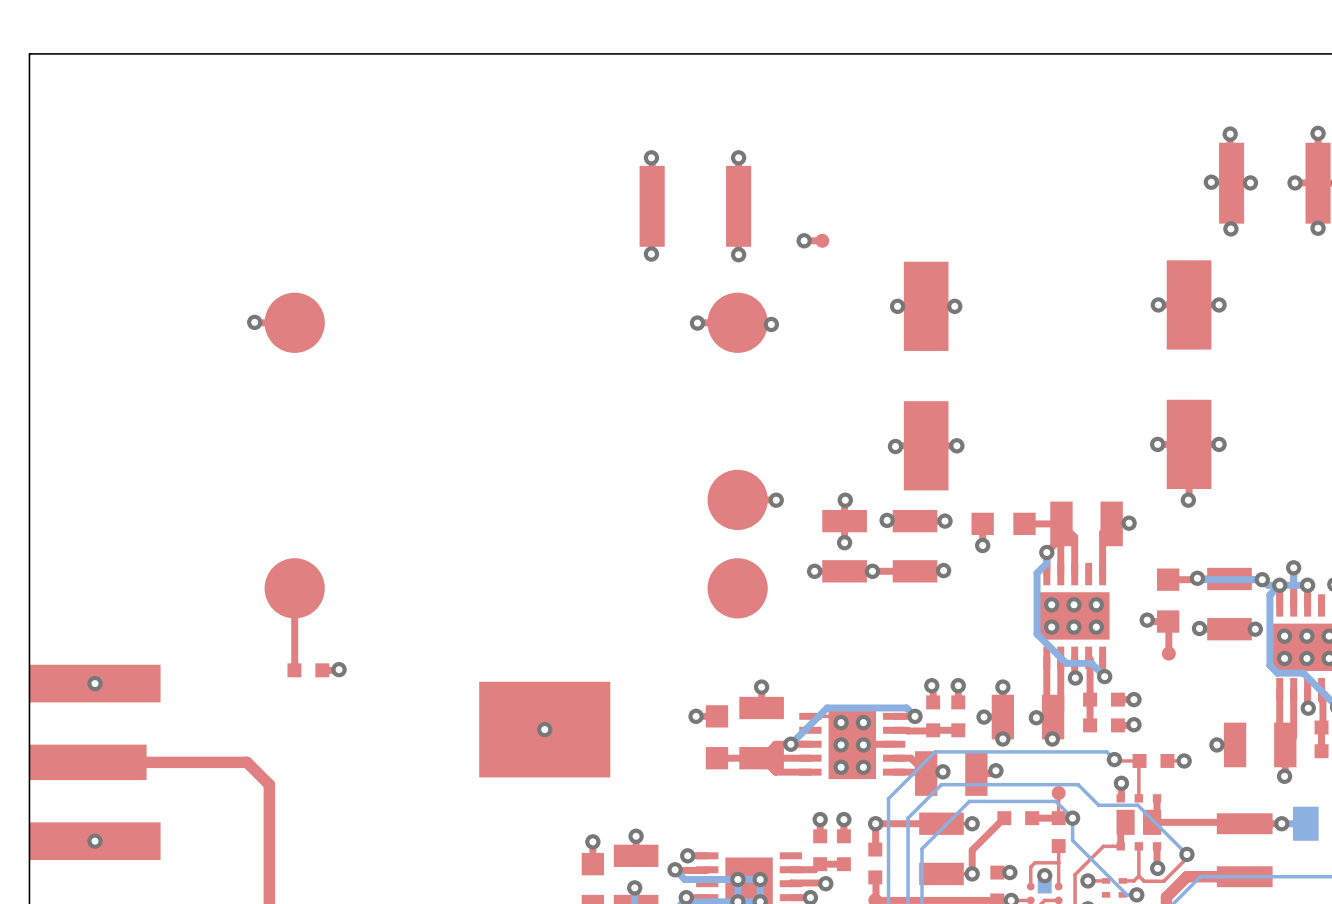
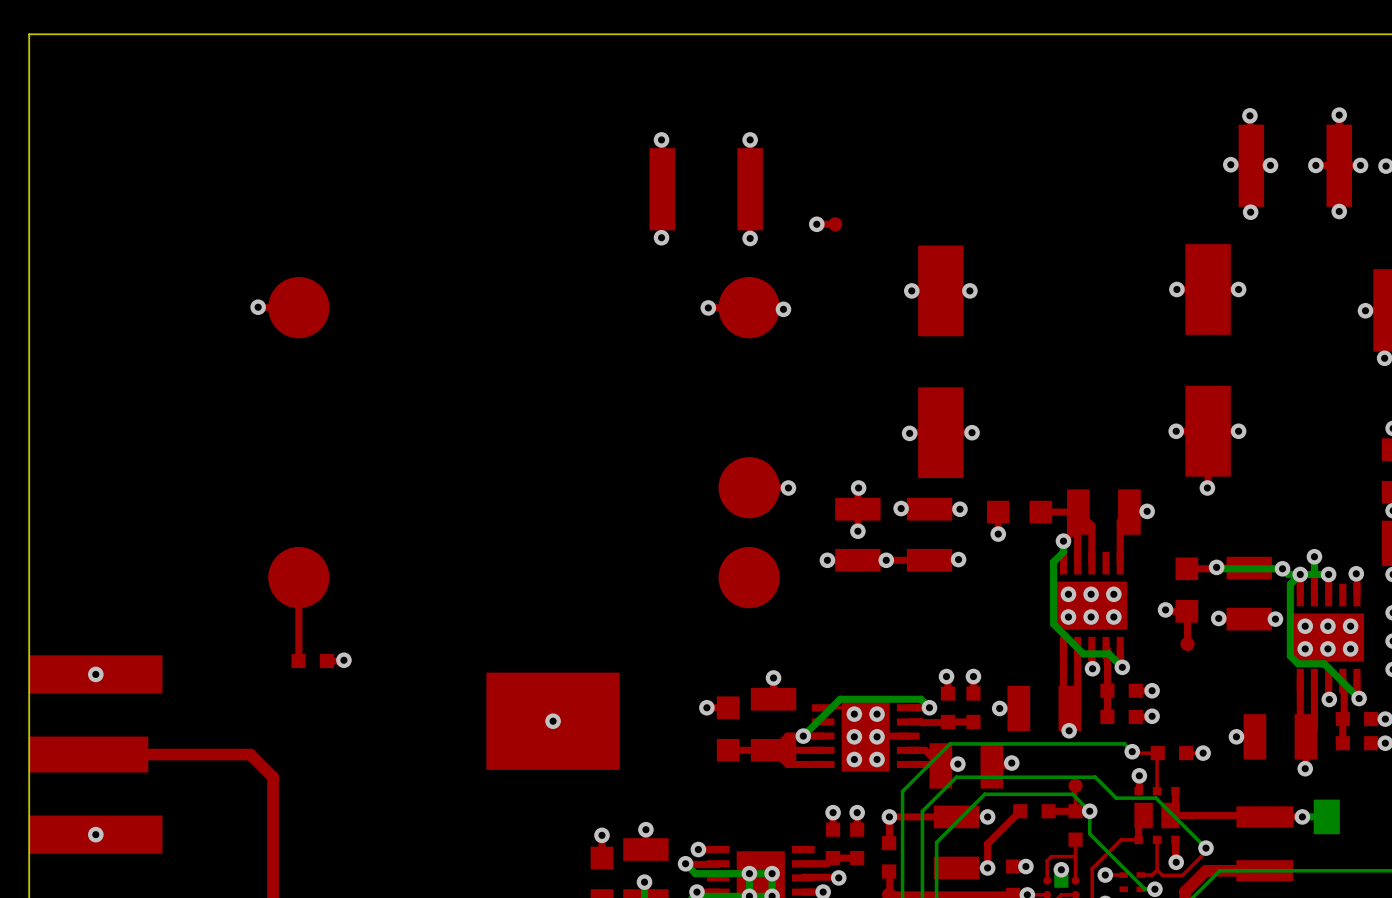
via: (1002, 687) -> none
via: (1036, 717) -> none
via: (1002, 739) -> none

